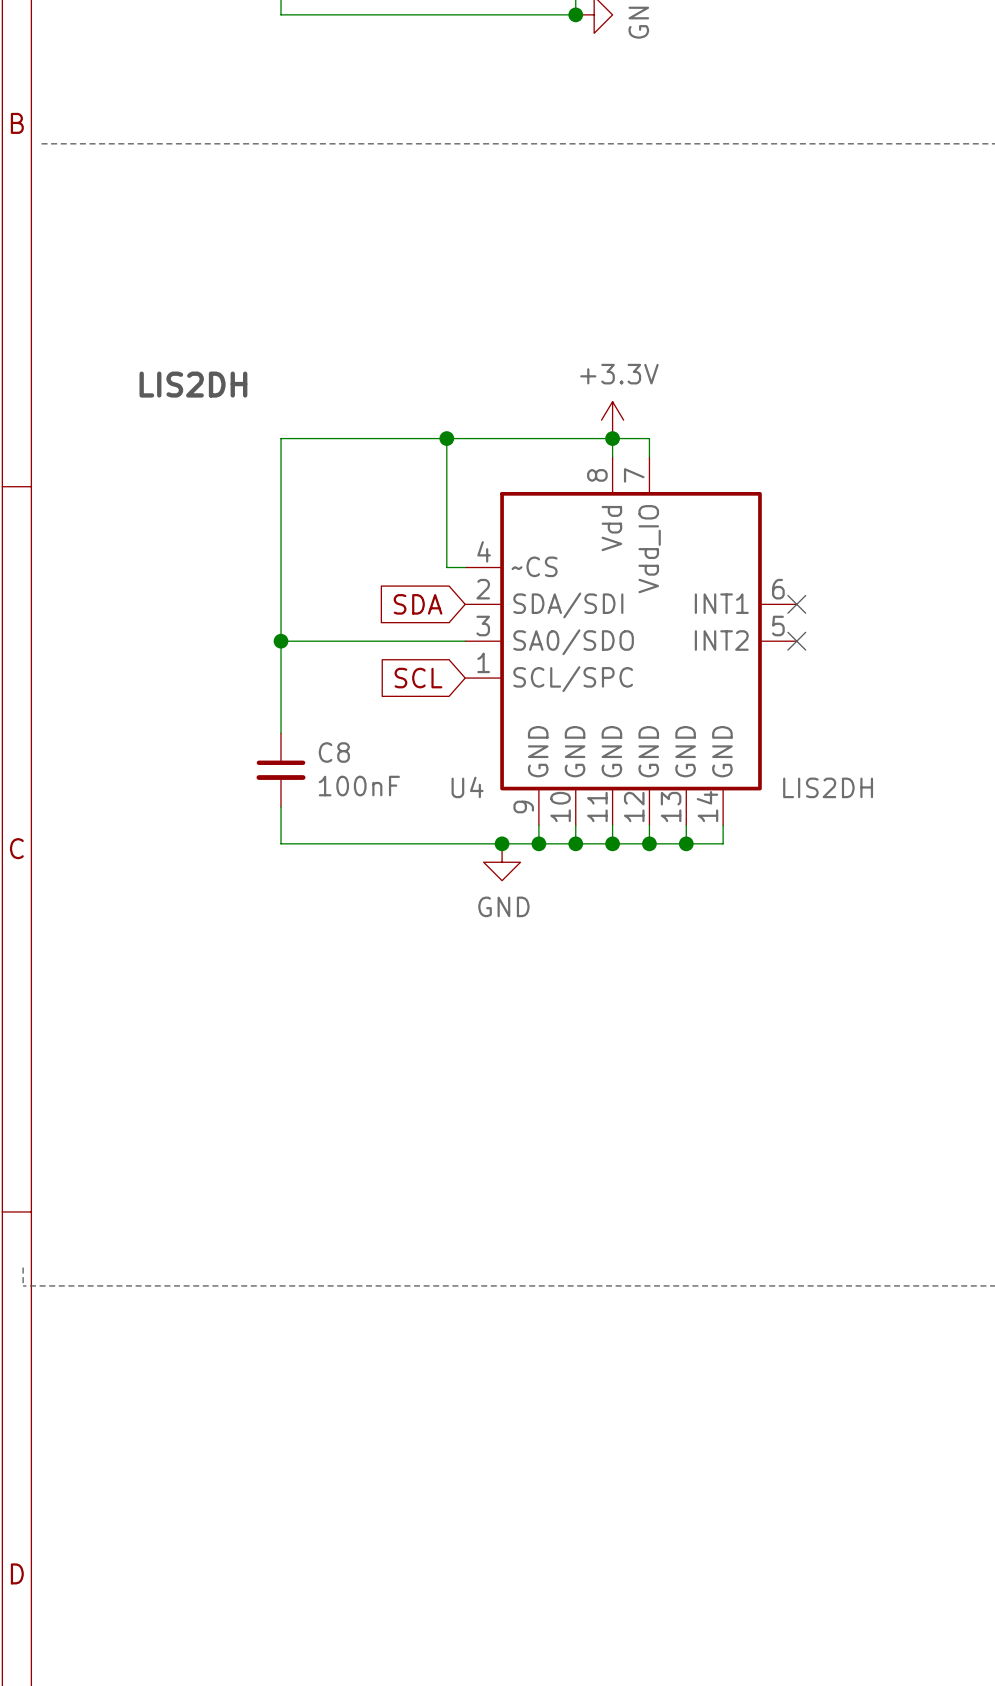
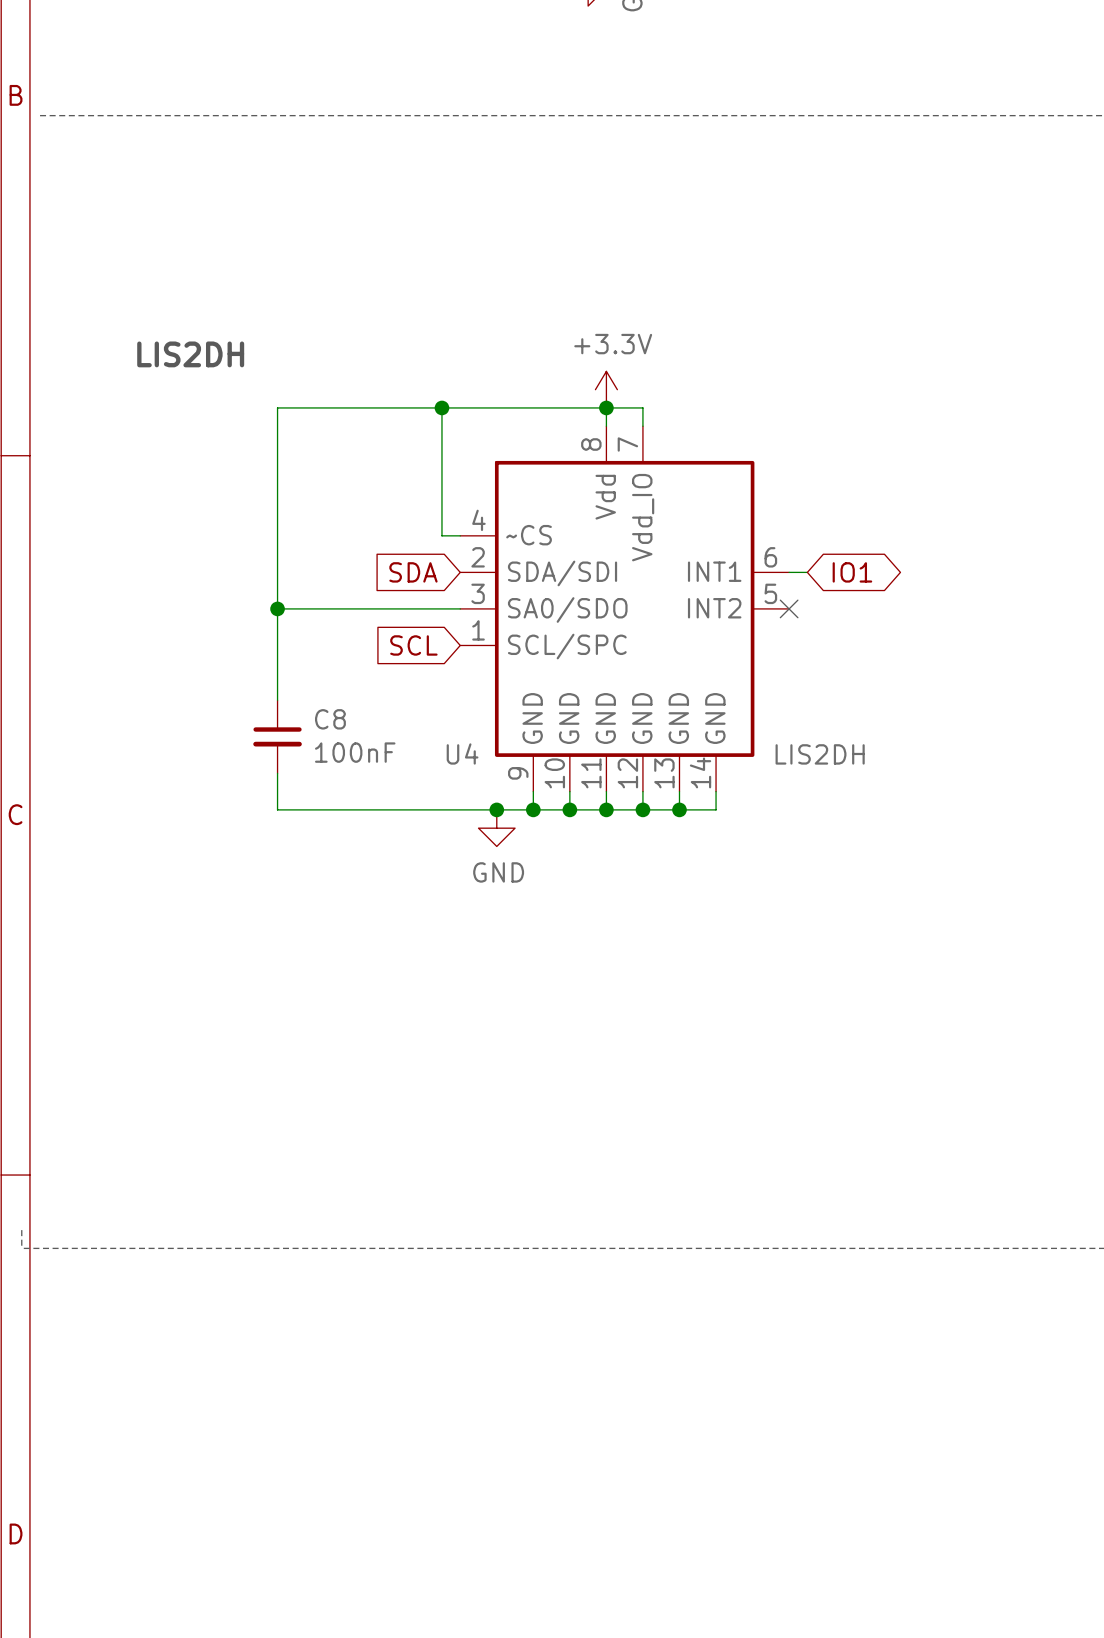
wire: none -> (789, 572) (807, 572)
no-connect mark: (796, 604) -> none
global label: none -> IO1 (852, 572)

